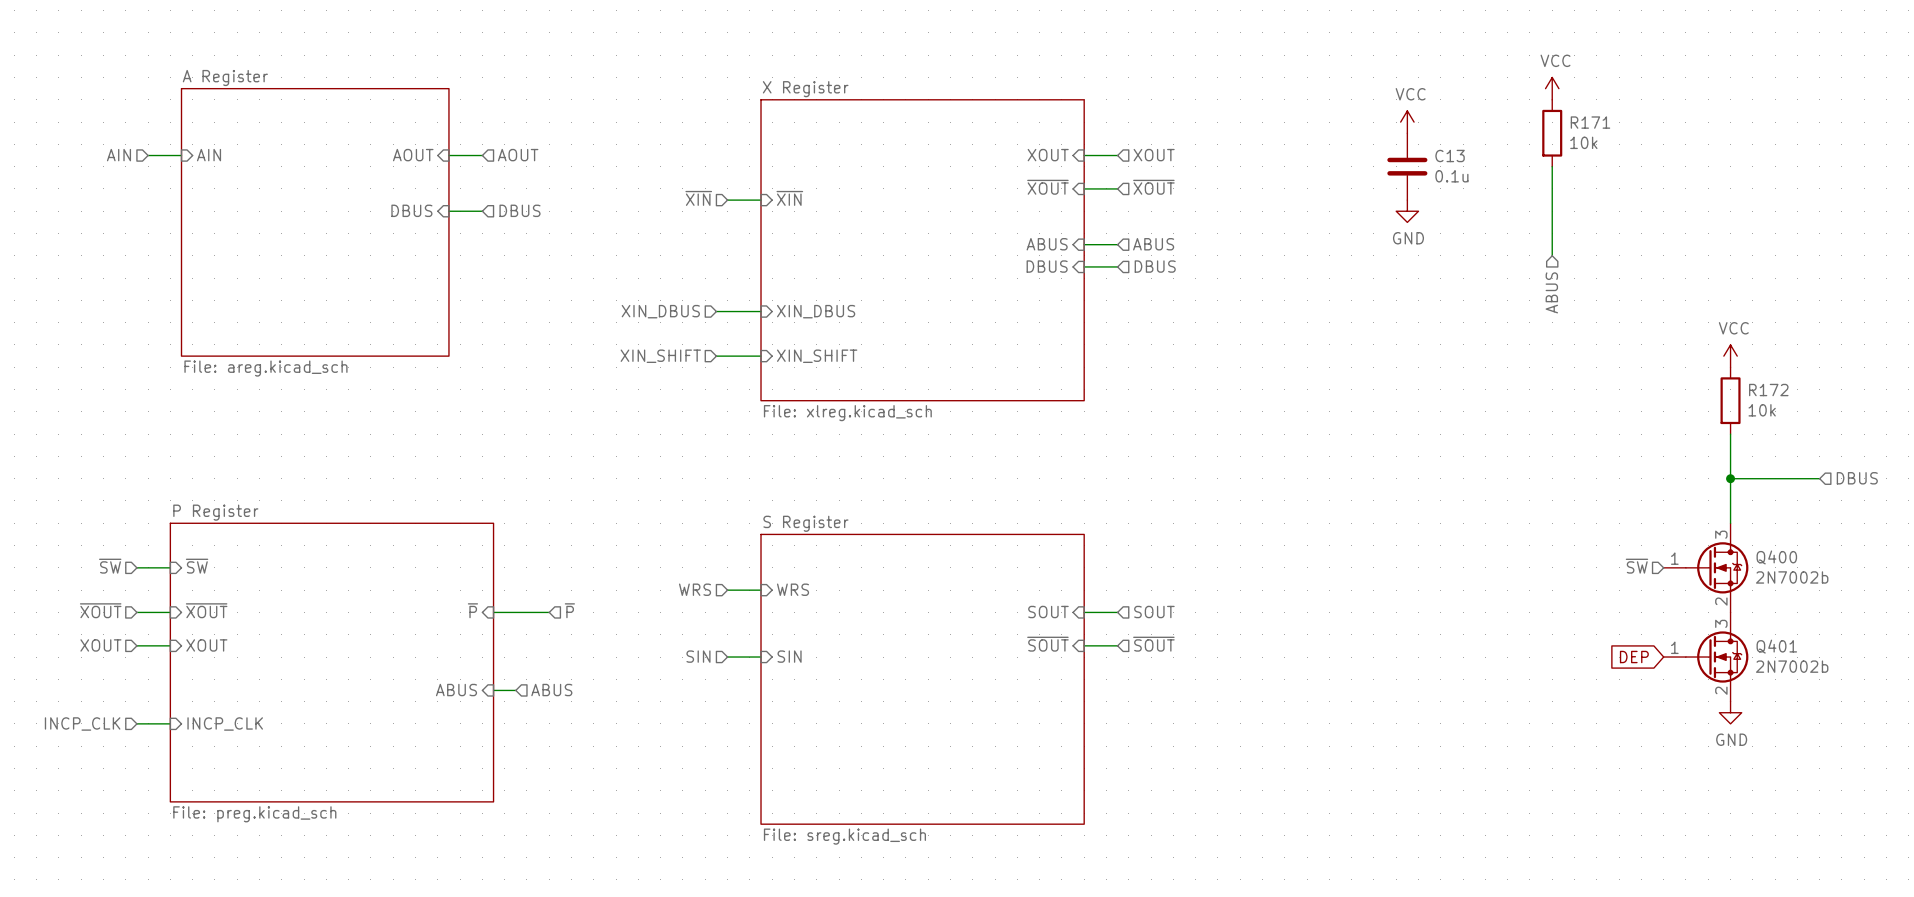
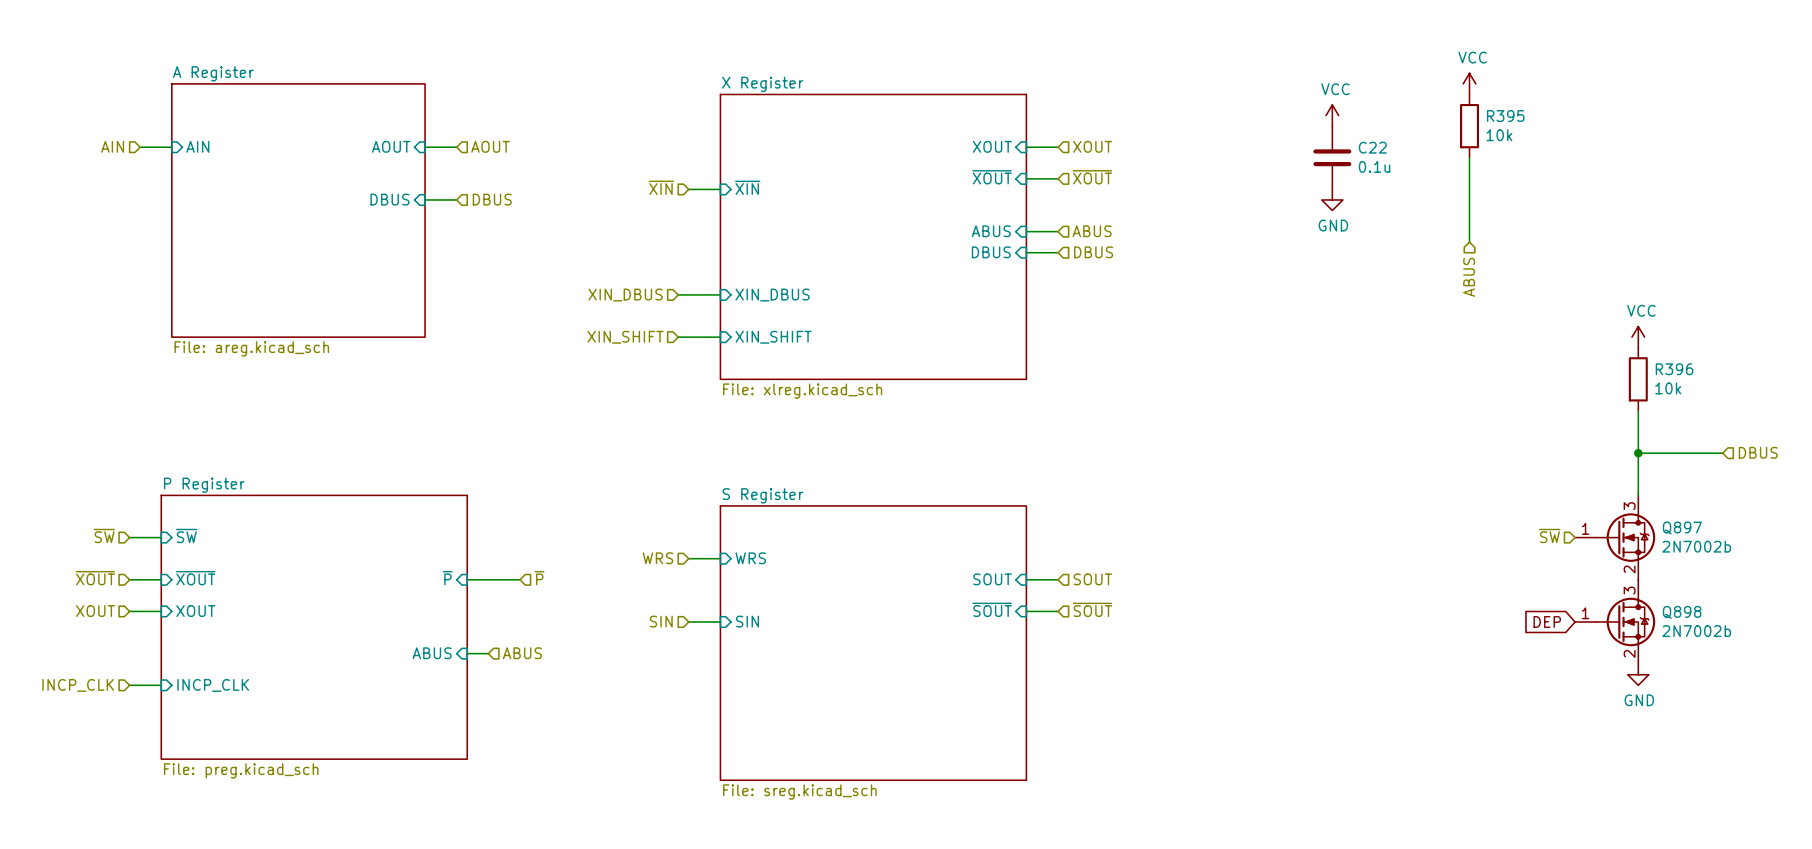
R171 name: R171 (1590, 122) -> R395 (1505, 116)
C13 name: C13 (1450, 155) -> C22 (1372, 147)
R172 name: R172 (1768, 390) -> R396 (1674, 369)
Q400 name: Q400 (1776, 557) -> Q897 (1682, 527)
Q401 name: Q401 (1776, 646) -> Q898 (1682, 612)

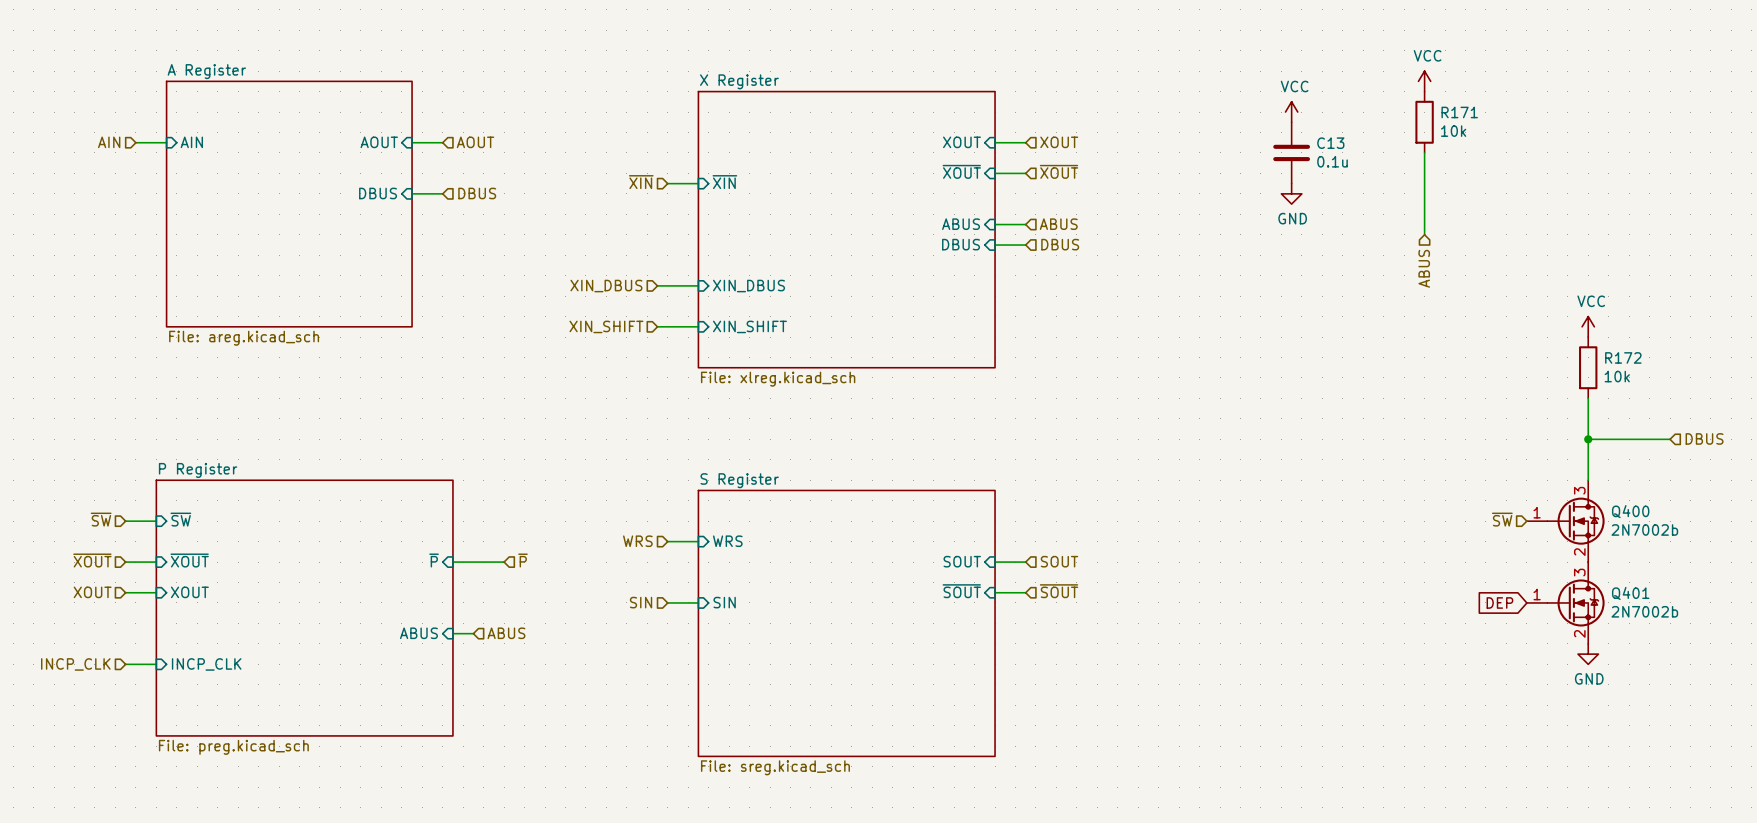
R395 name: R395 (1505, 116) -> R171 (1459, 112)
C22 name: C22 (1372, 147) -> C13 (1330, 143)
R396 name: R396 (1674, 369) -> R172 (1623, 357)
Q897 name: Q897 (1682, 527) -> Q400 (1630, 511)
Q898 name: Q898 (1682, 612) -> Q401 (1630, 593)

